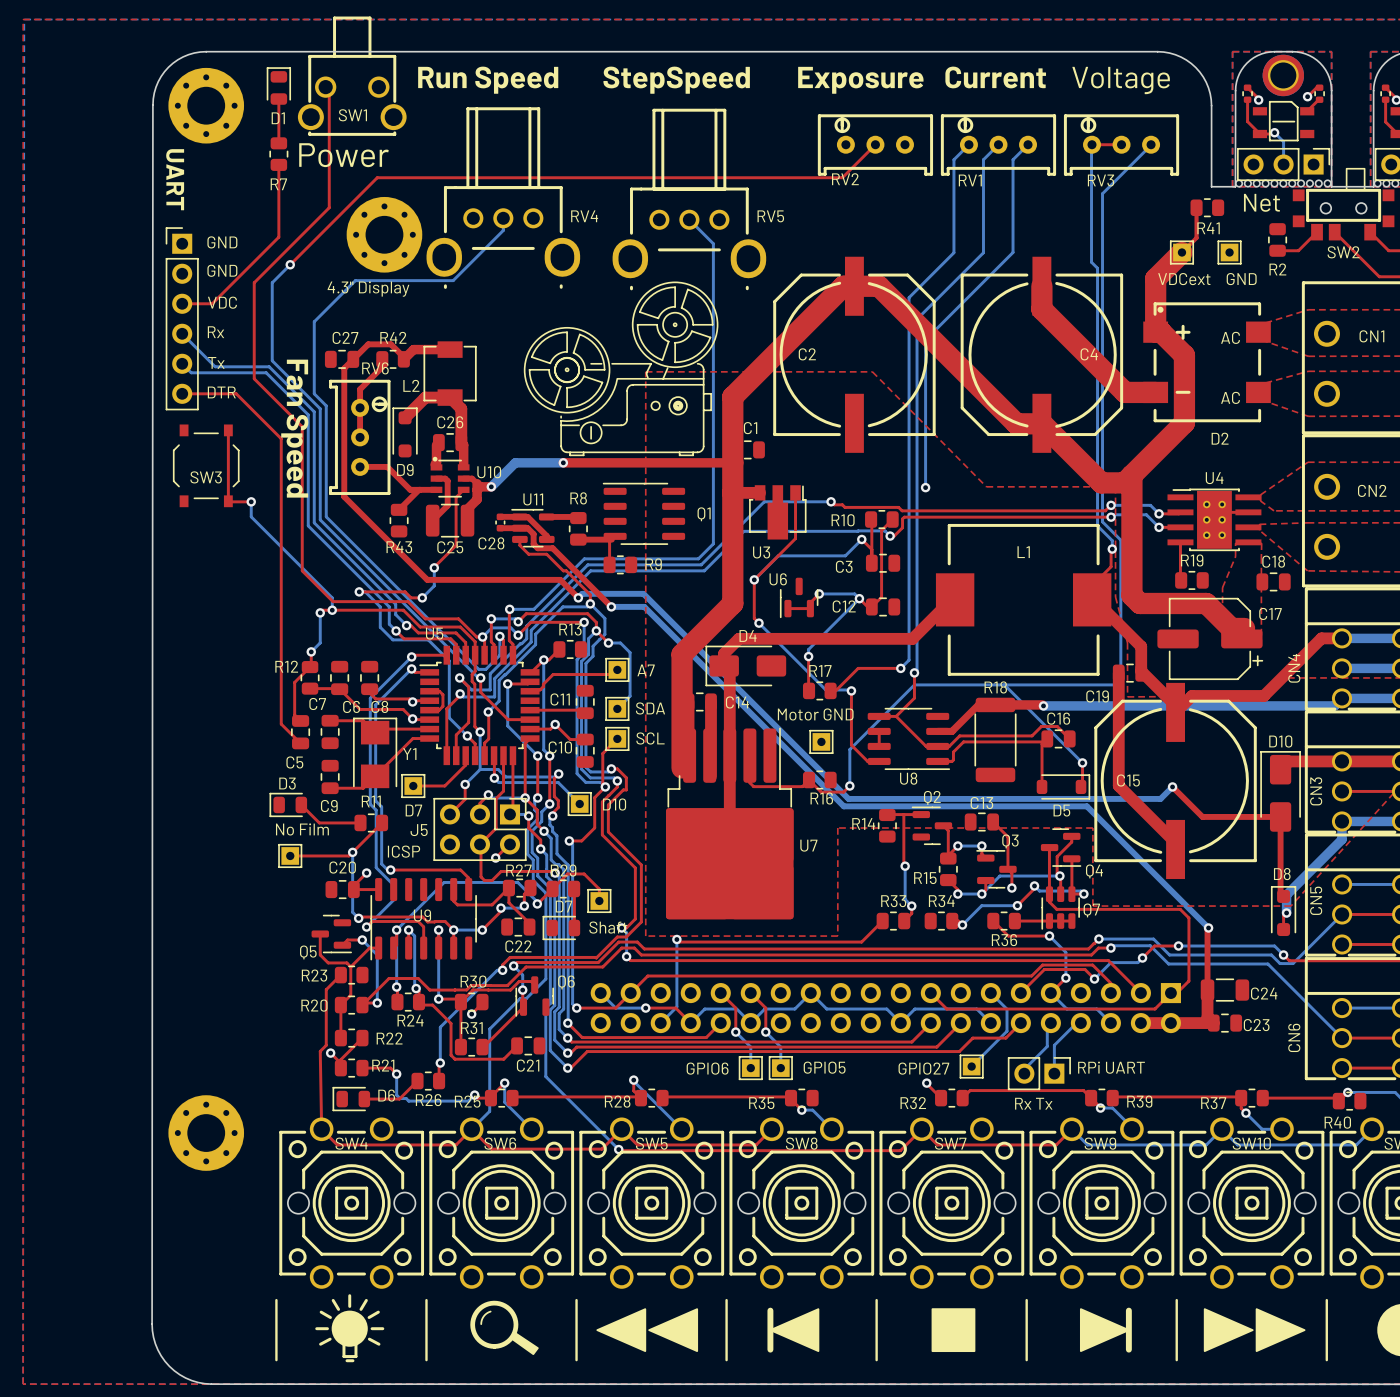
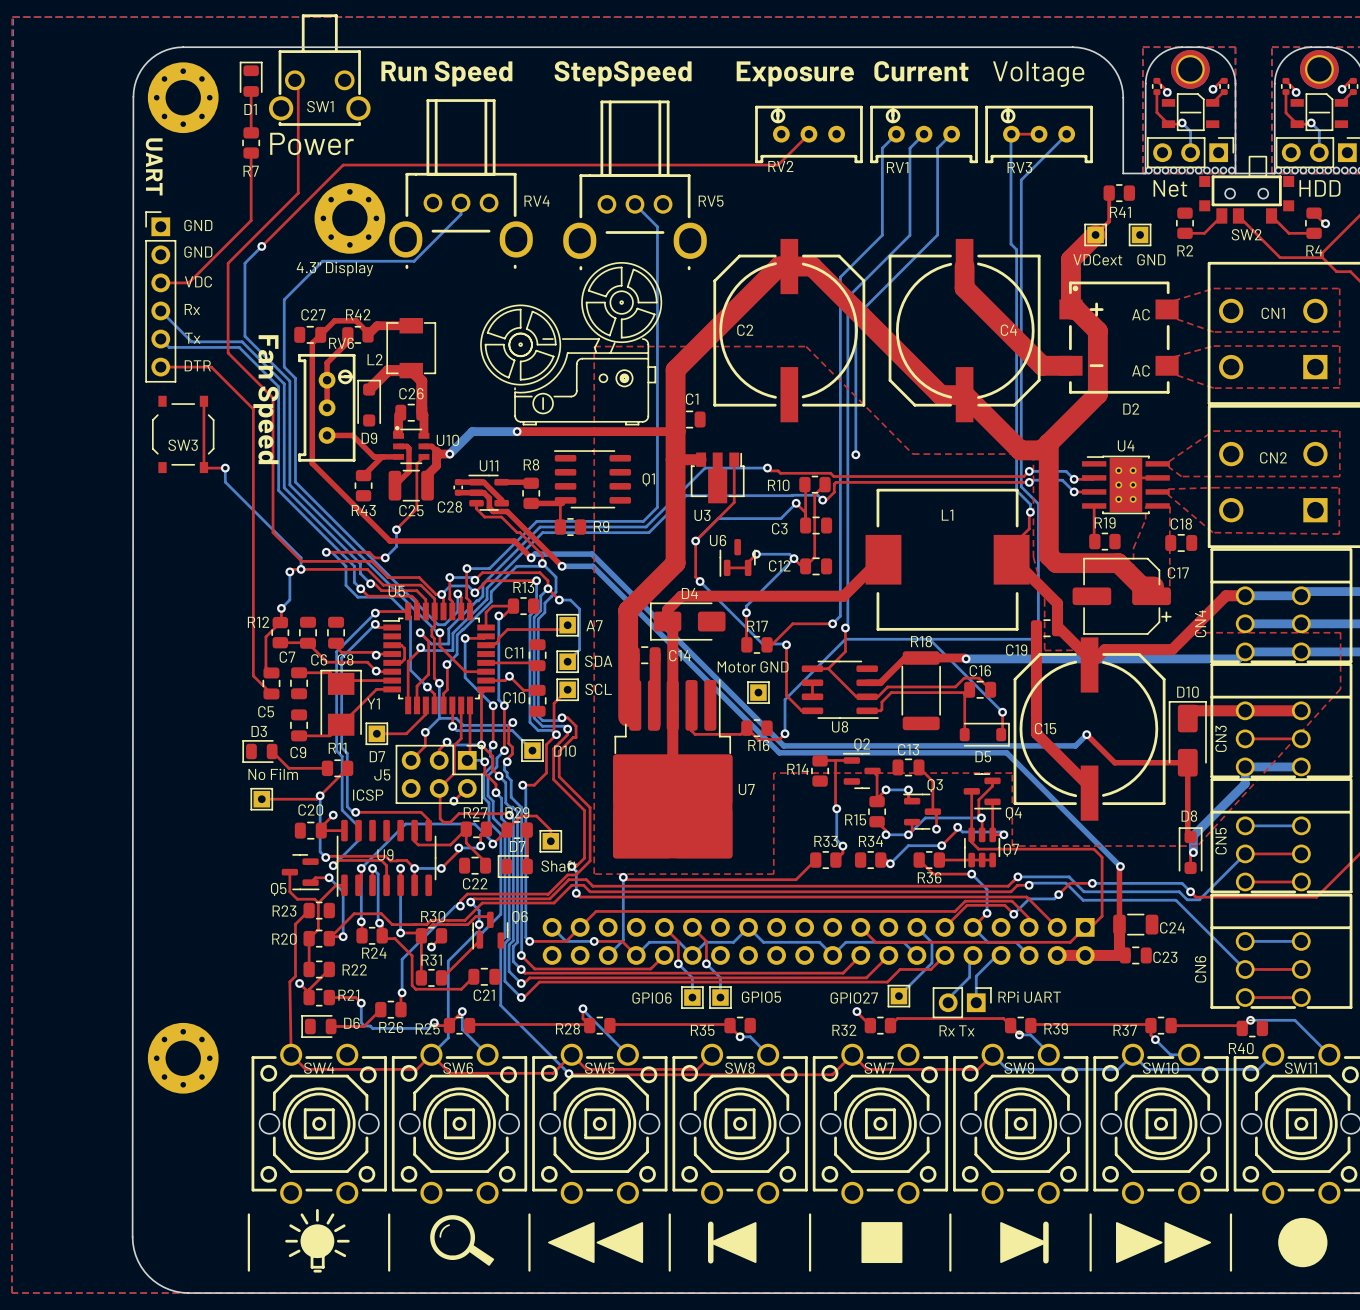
top track: (543, 659) (530, 672) -> (513, 606) (492, 606) (486, 612) (486, 627)

